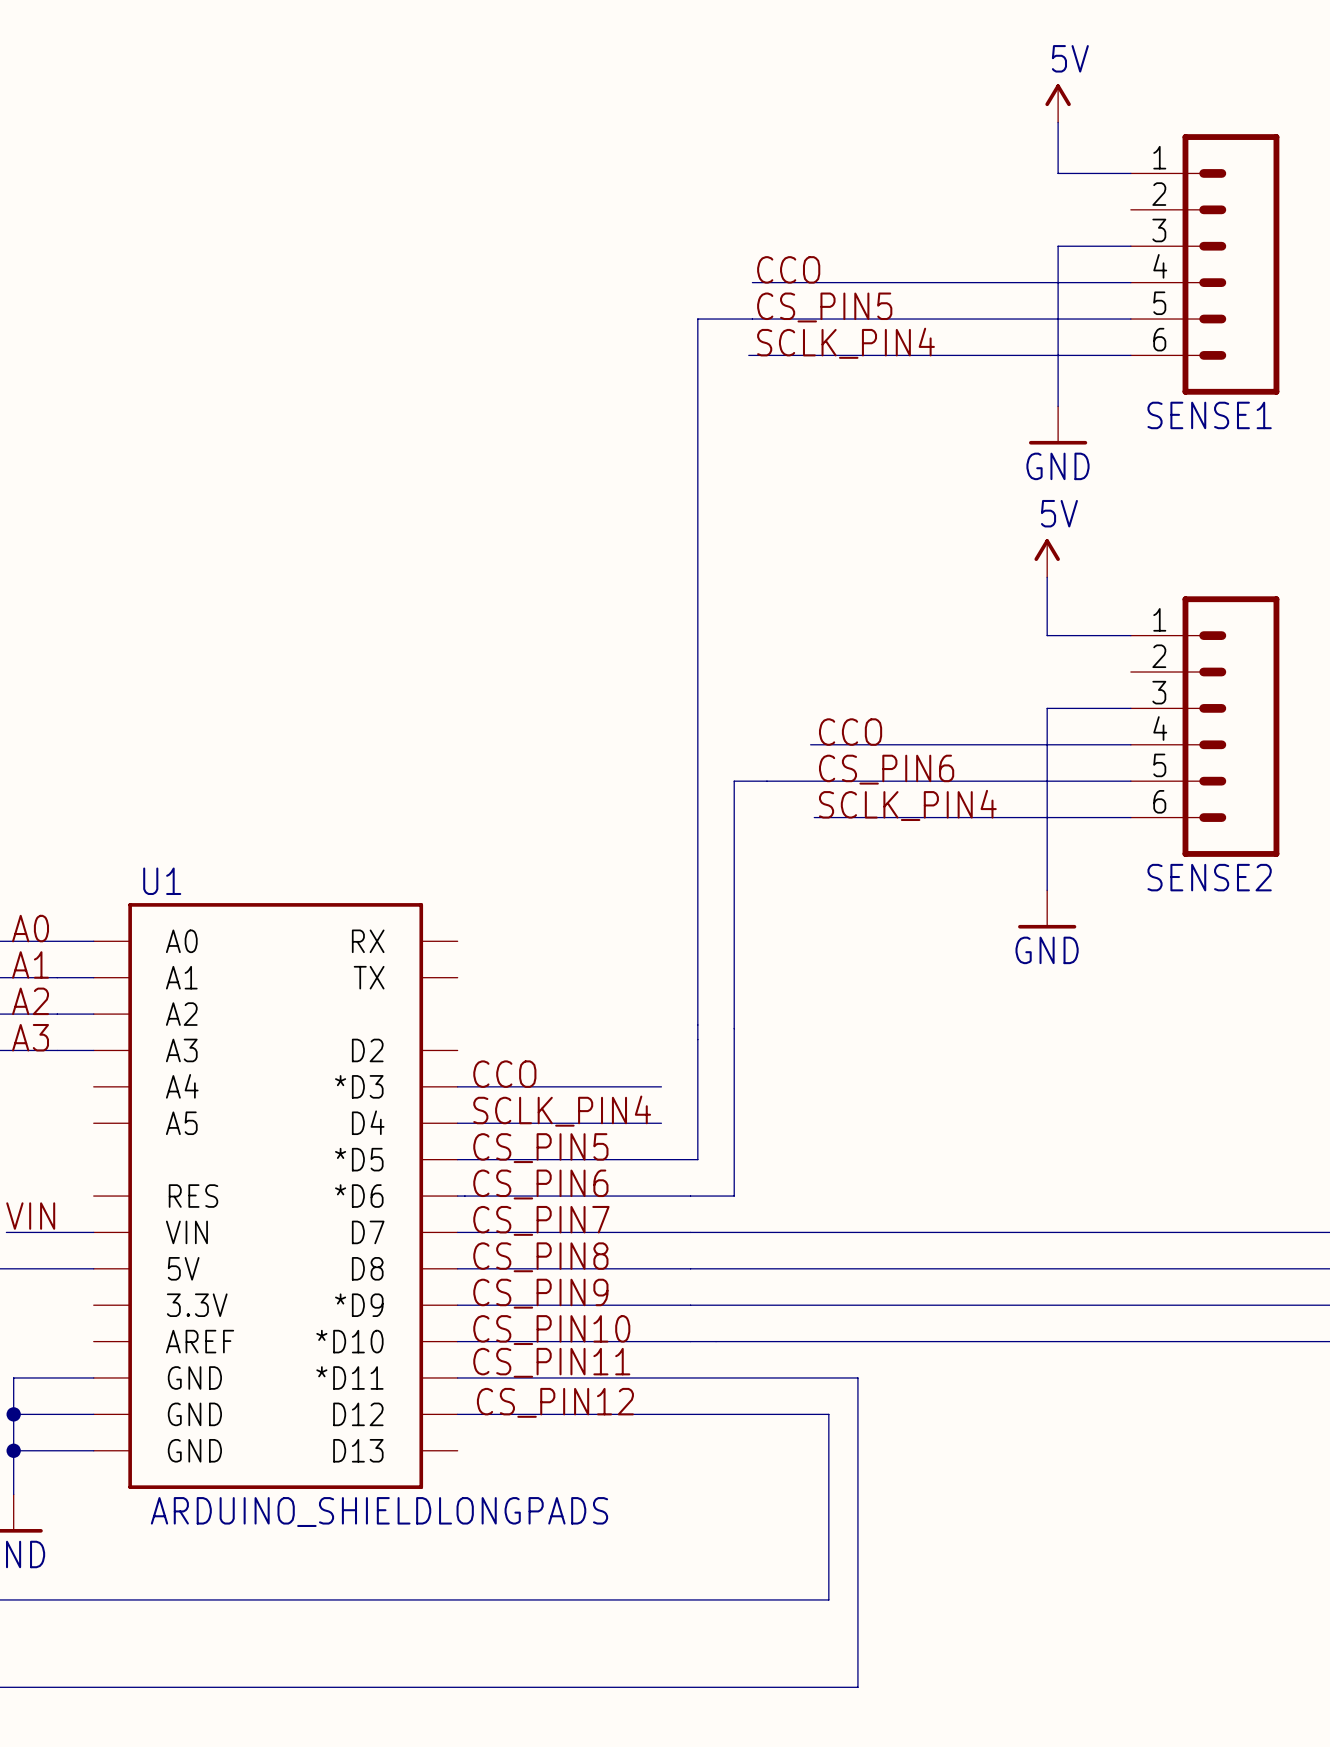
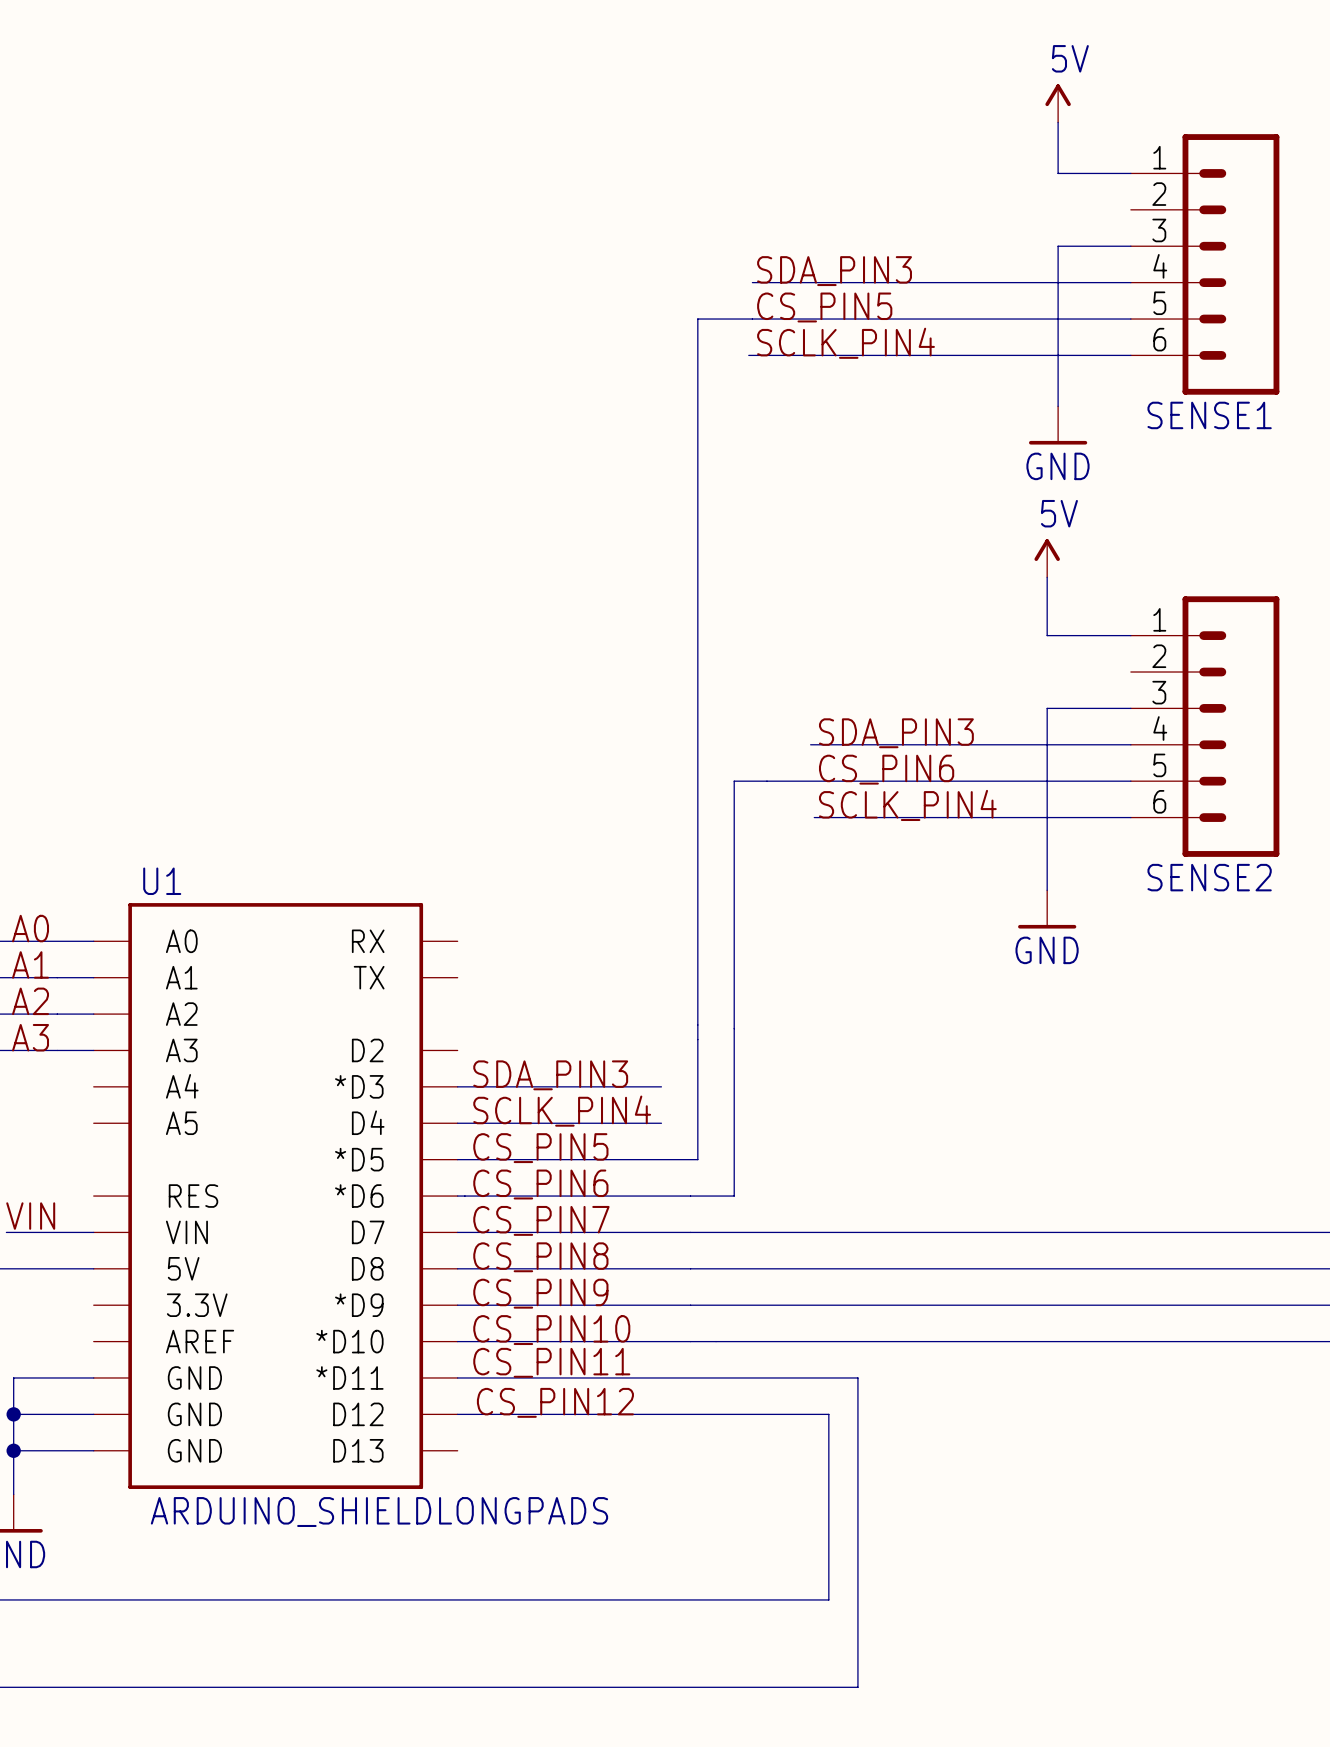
label: CCO (788, 269) -> SDA_PIN3 (834, 271)
label: CCO (850, 732) -> SDA_PIN3 (896, 733)
label: CCO (504, 1074) -> SDA_PIN3 (550, 1075)

